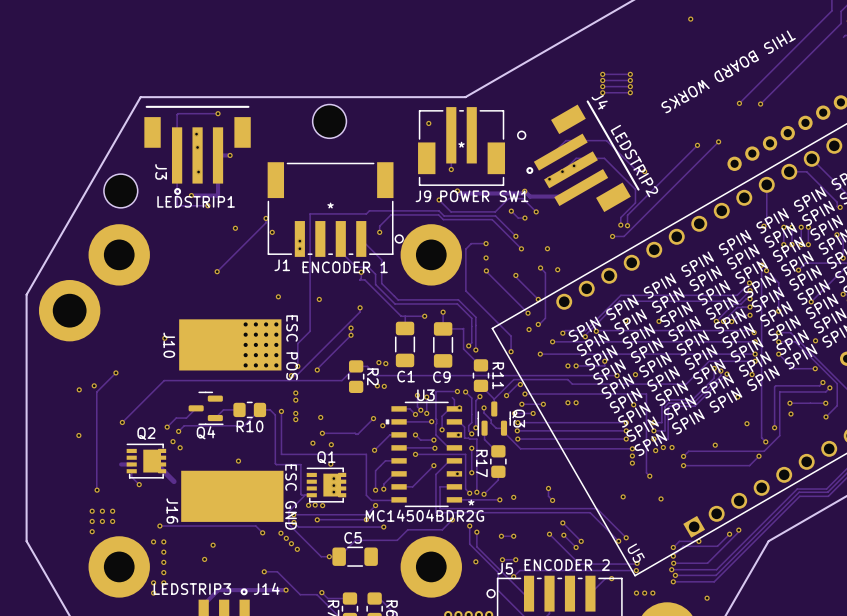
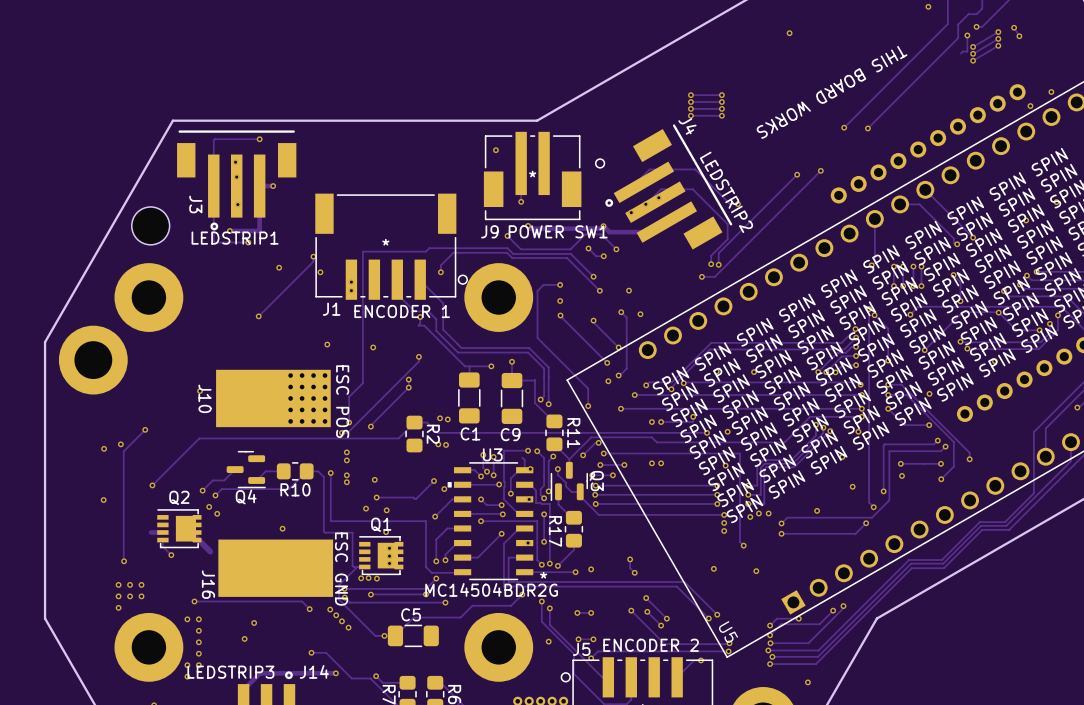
part: (329, 121) -> none
via: (636, 593) -> none
via: (644, 593) -> none
via: (652, 593) -> none

